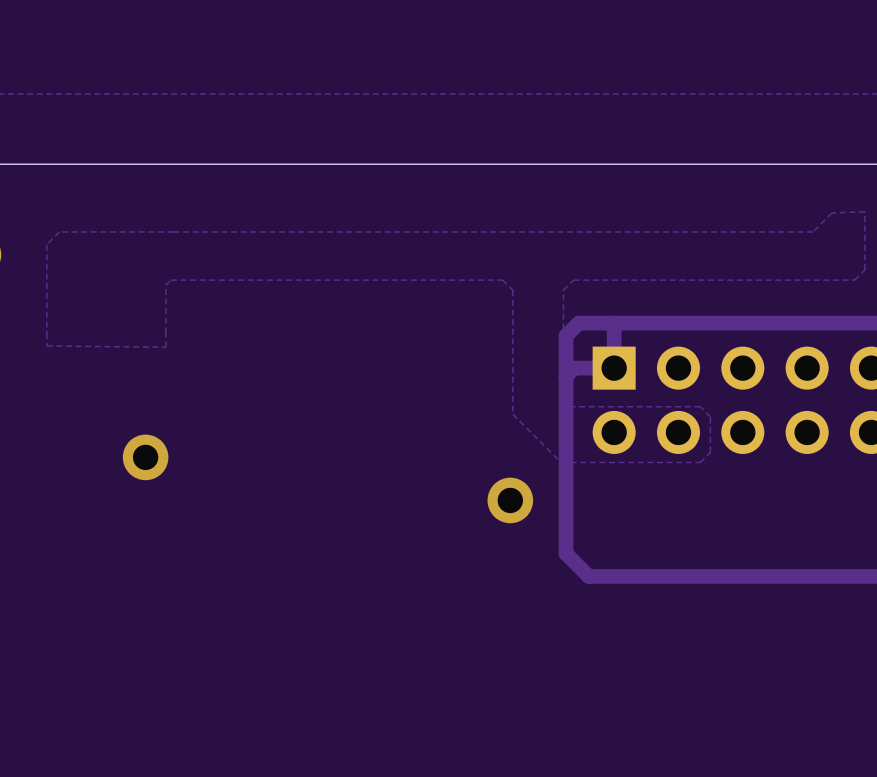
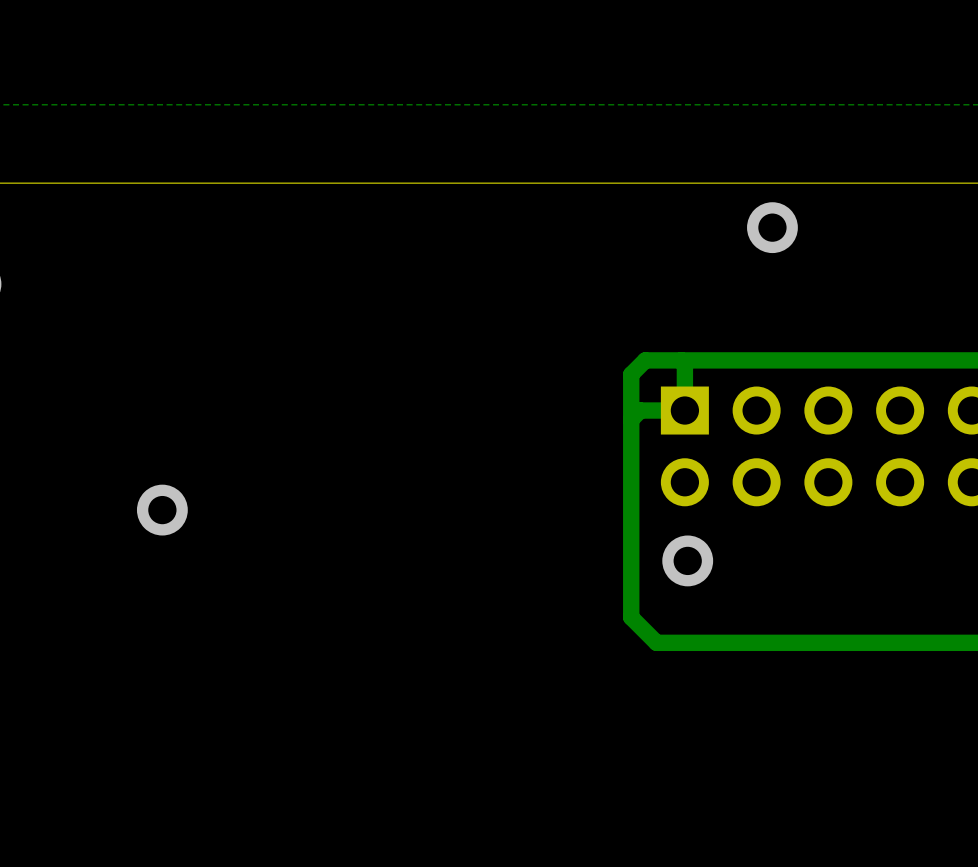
via: none -> (772, 227)
zone outline: (864, 211) (864, 269) (854, 280) (573, 280) (563, 290) (563, 396) (573, 406) (700, 406) (710, 416) (710, 452) (700, 462) (560, 462) (512, 414) (512, 290) (502, 280) (170, 280) (165, 285) (165, 347) (46, 345) (46, 244) (59, 231) (812, 231) (831, 213) (864, 211) -> none
via position: (510, 500) -> (687, 560)

